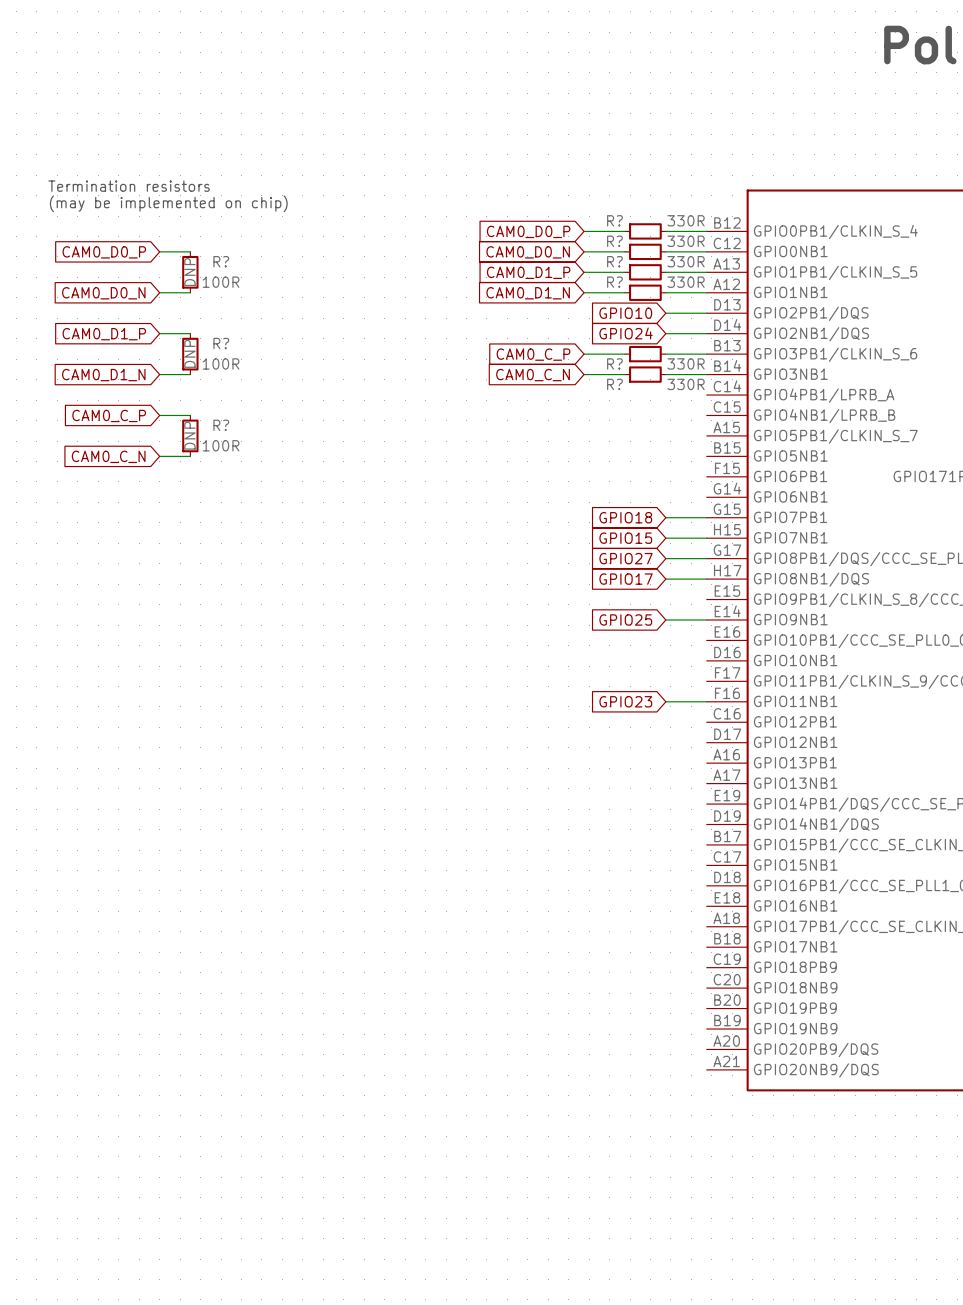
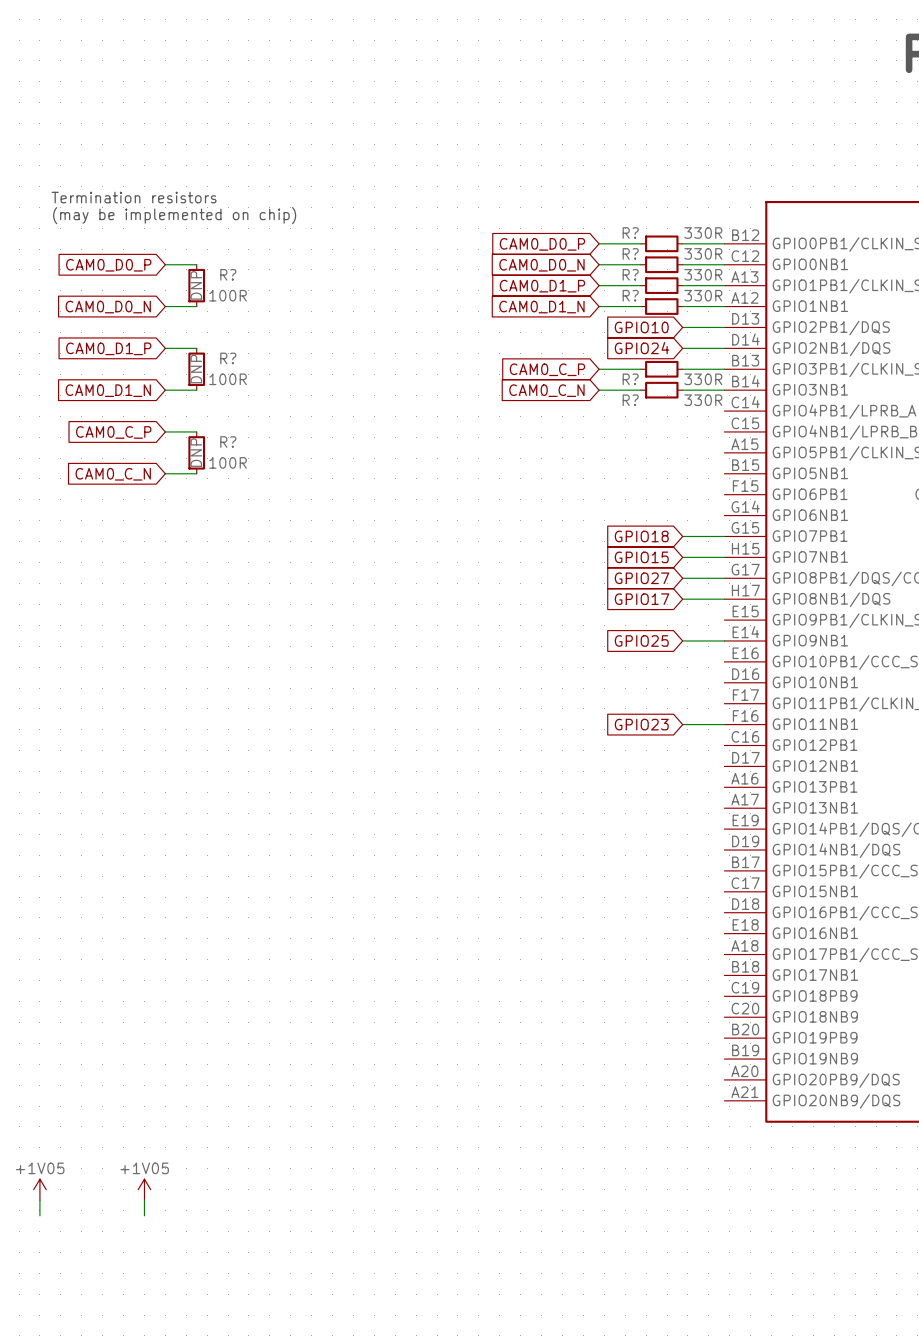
power symbol: none -> +1V05 (39, 1189)
power symbol: none -> +1V05 (144, 1189)
wire: none -> (39, 1200) (39, 1215)
wire: none -> (144, 1200) (144, 1215)

